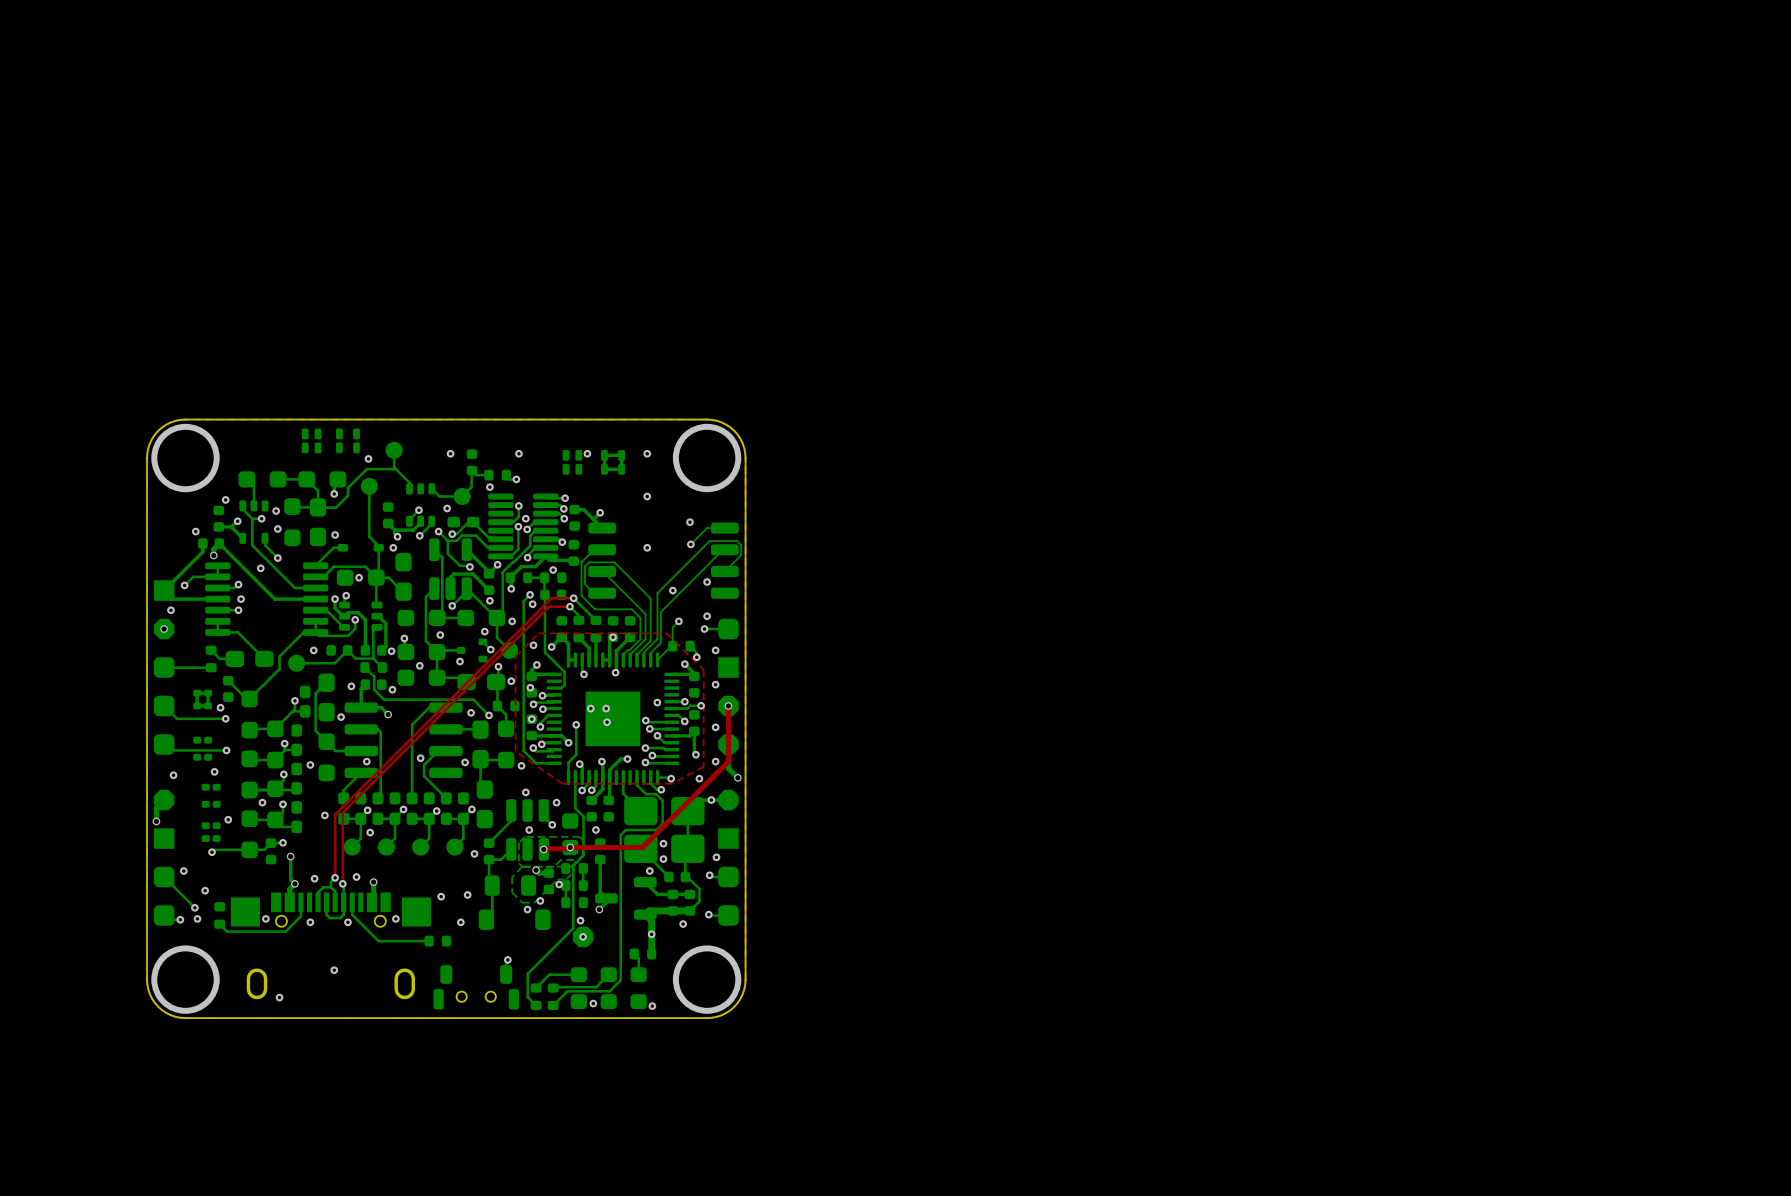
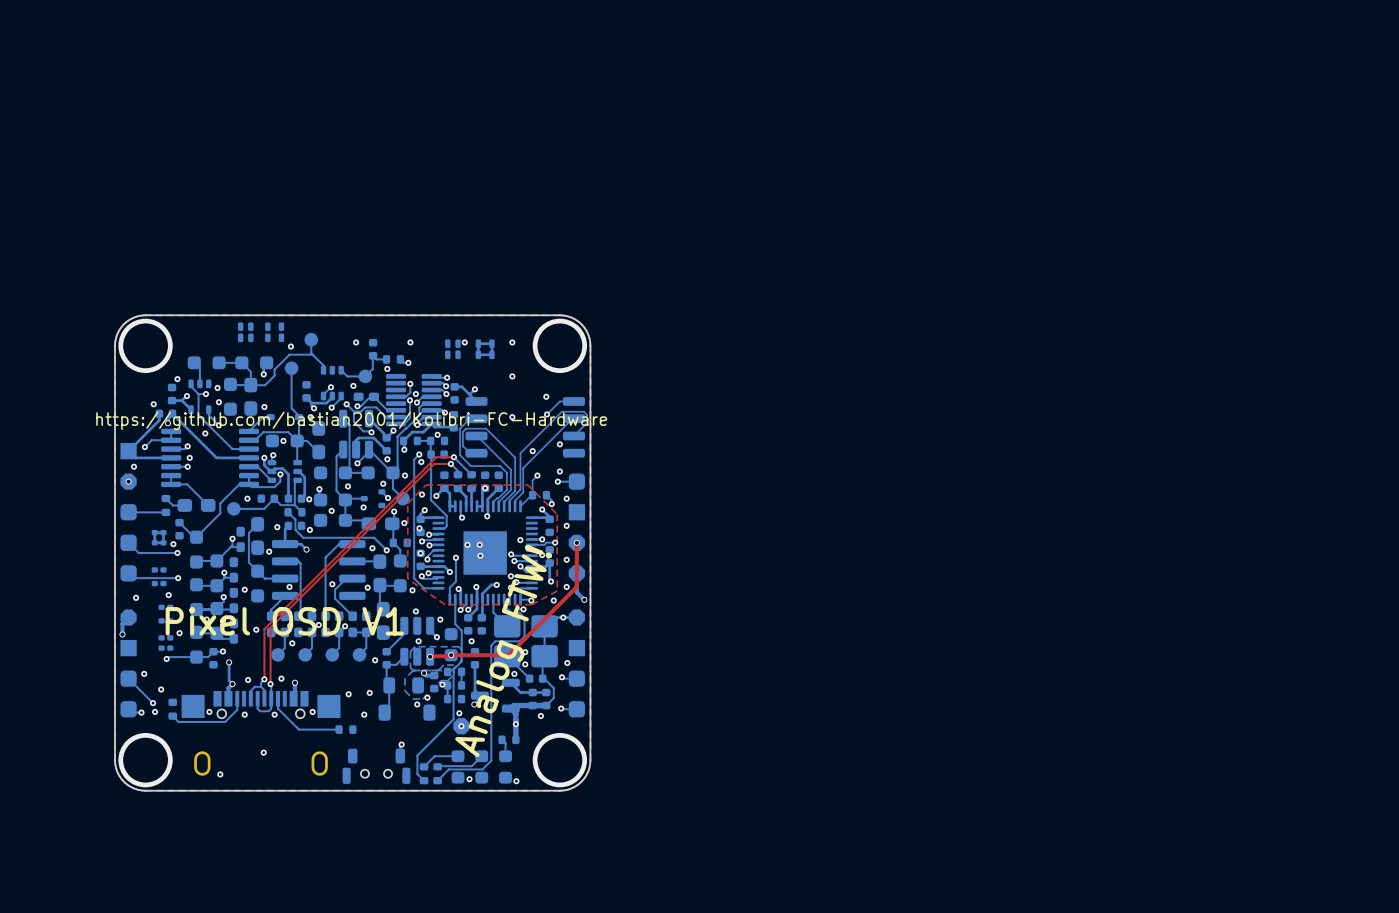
text: none -> https://github.com/bastian2001/Kolibri-FC-Hardware (351, 420)
text: none -> Pixel OSD V1 (284, 621)
text: none -> Analog FTW! (503, 650)

